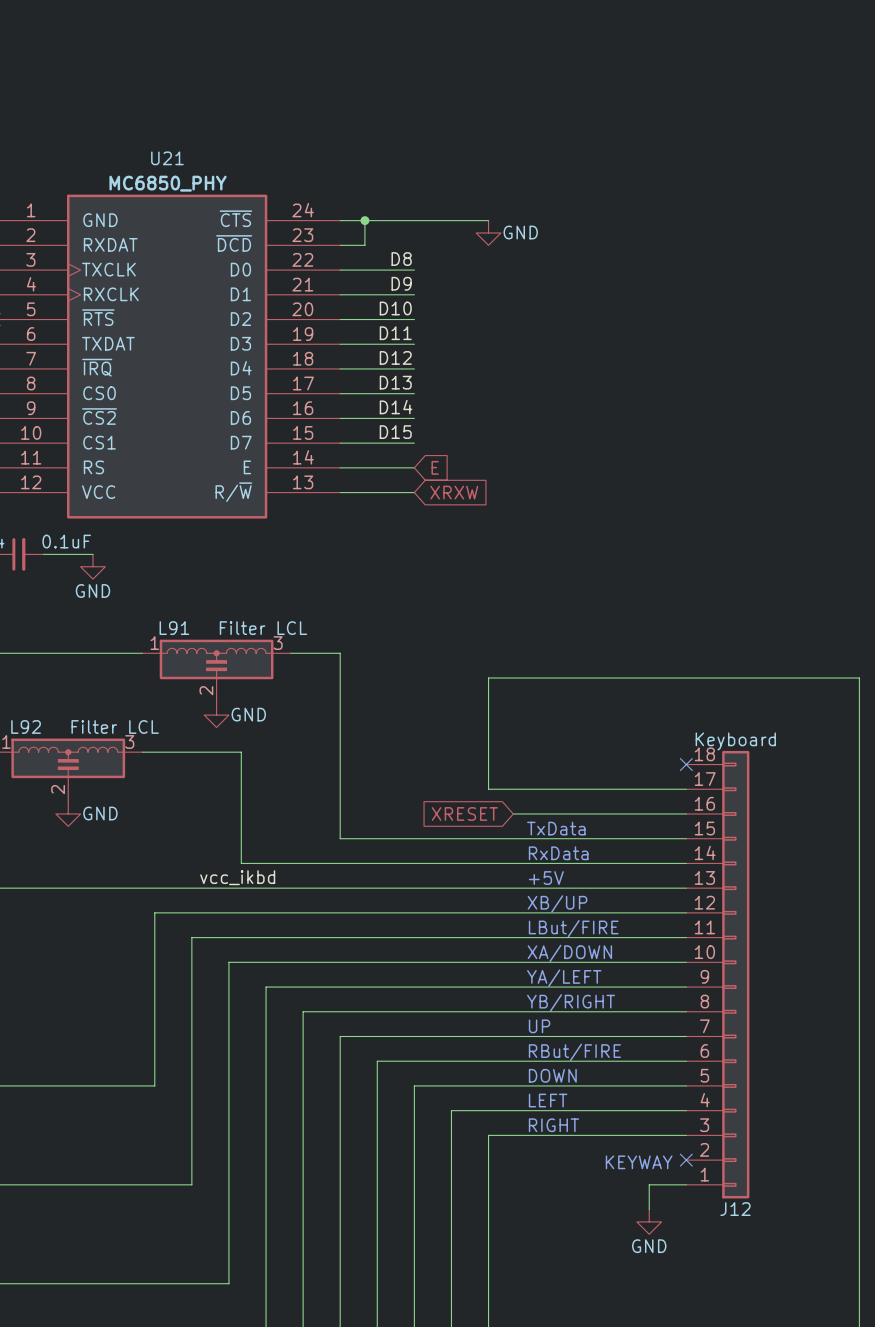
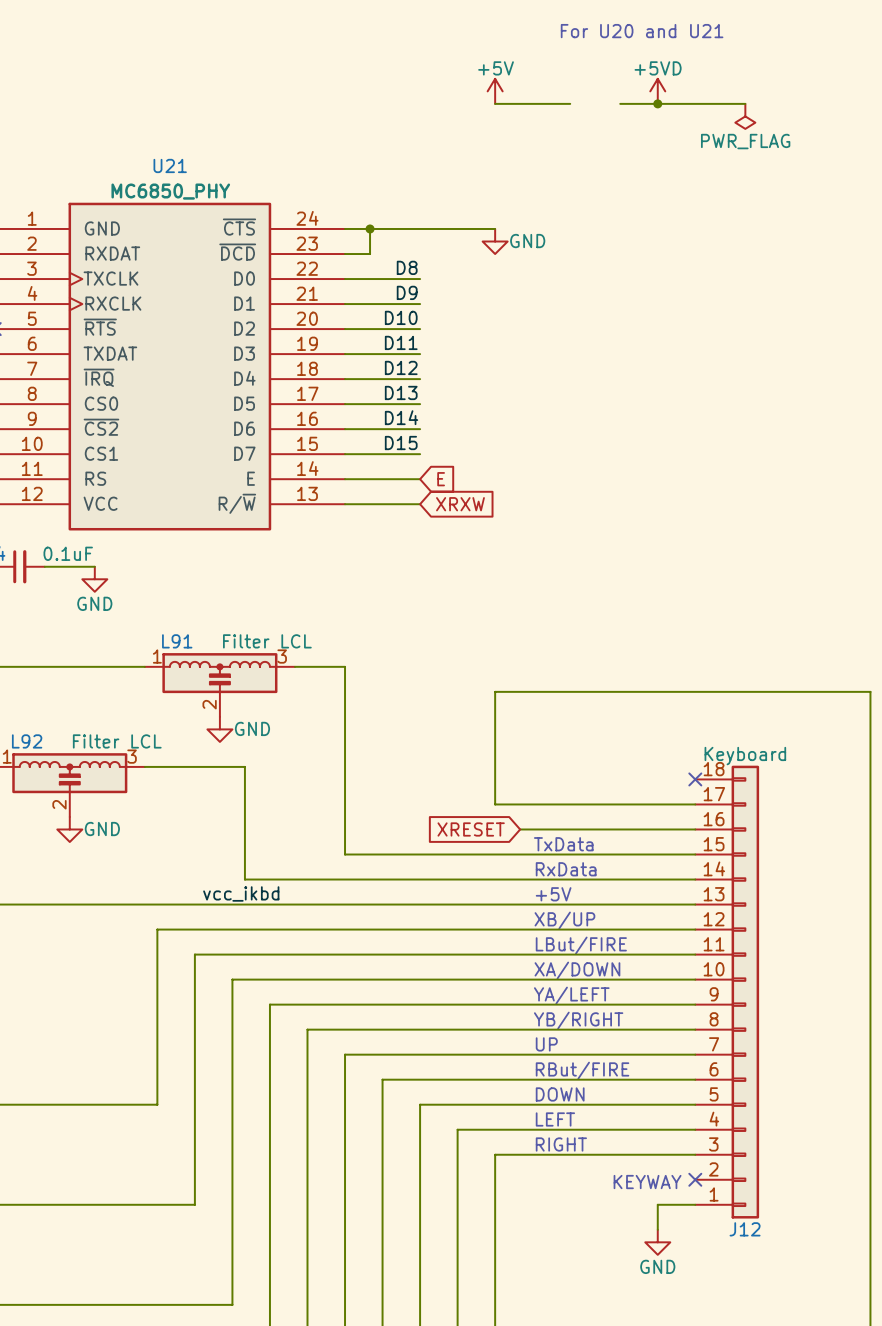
text: none -> For U20 and U21 (642, 31)
power symbol: none -> +5V (495, 91)
power symbol: none -> +5VD (657, 91)
wire: none -> (495, 103) (570, 103)
wire: none -> (620, 103) (745, 103)
junction: none -> (657, 103)
power symbol: none -> PWR_FLAG (745, 116)

